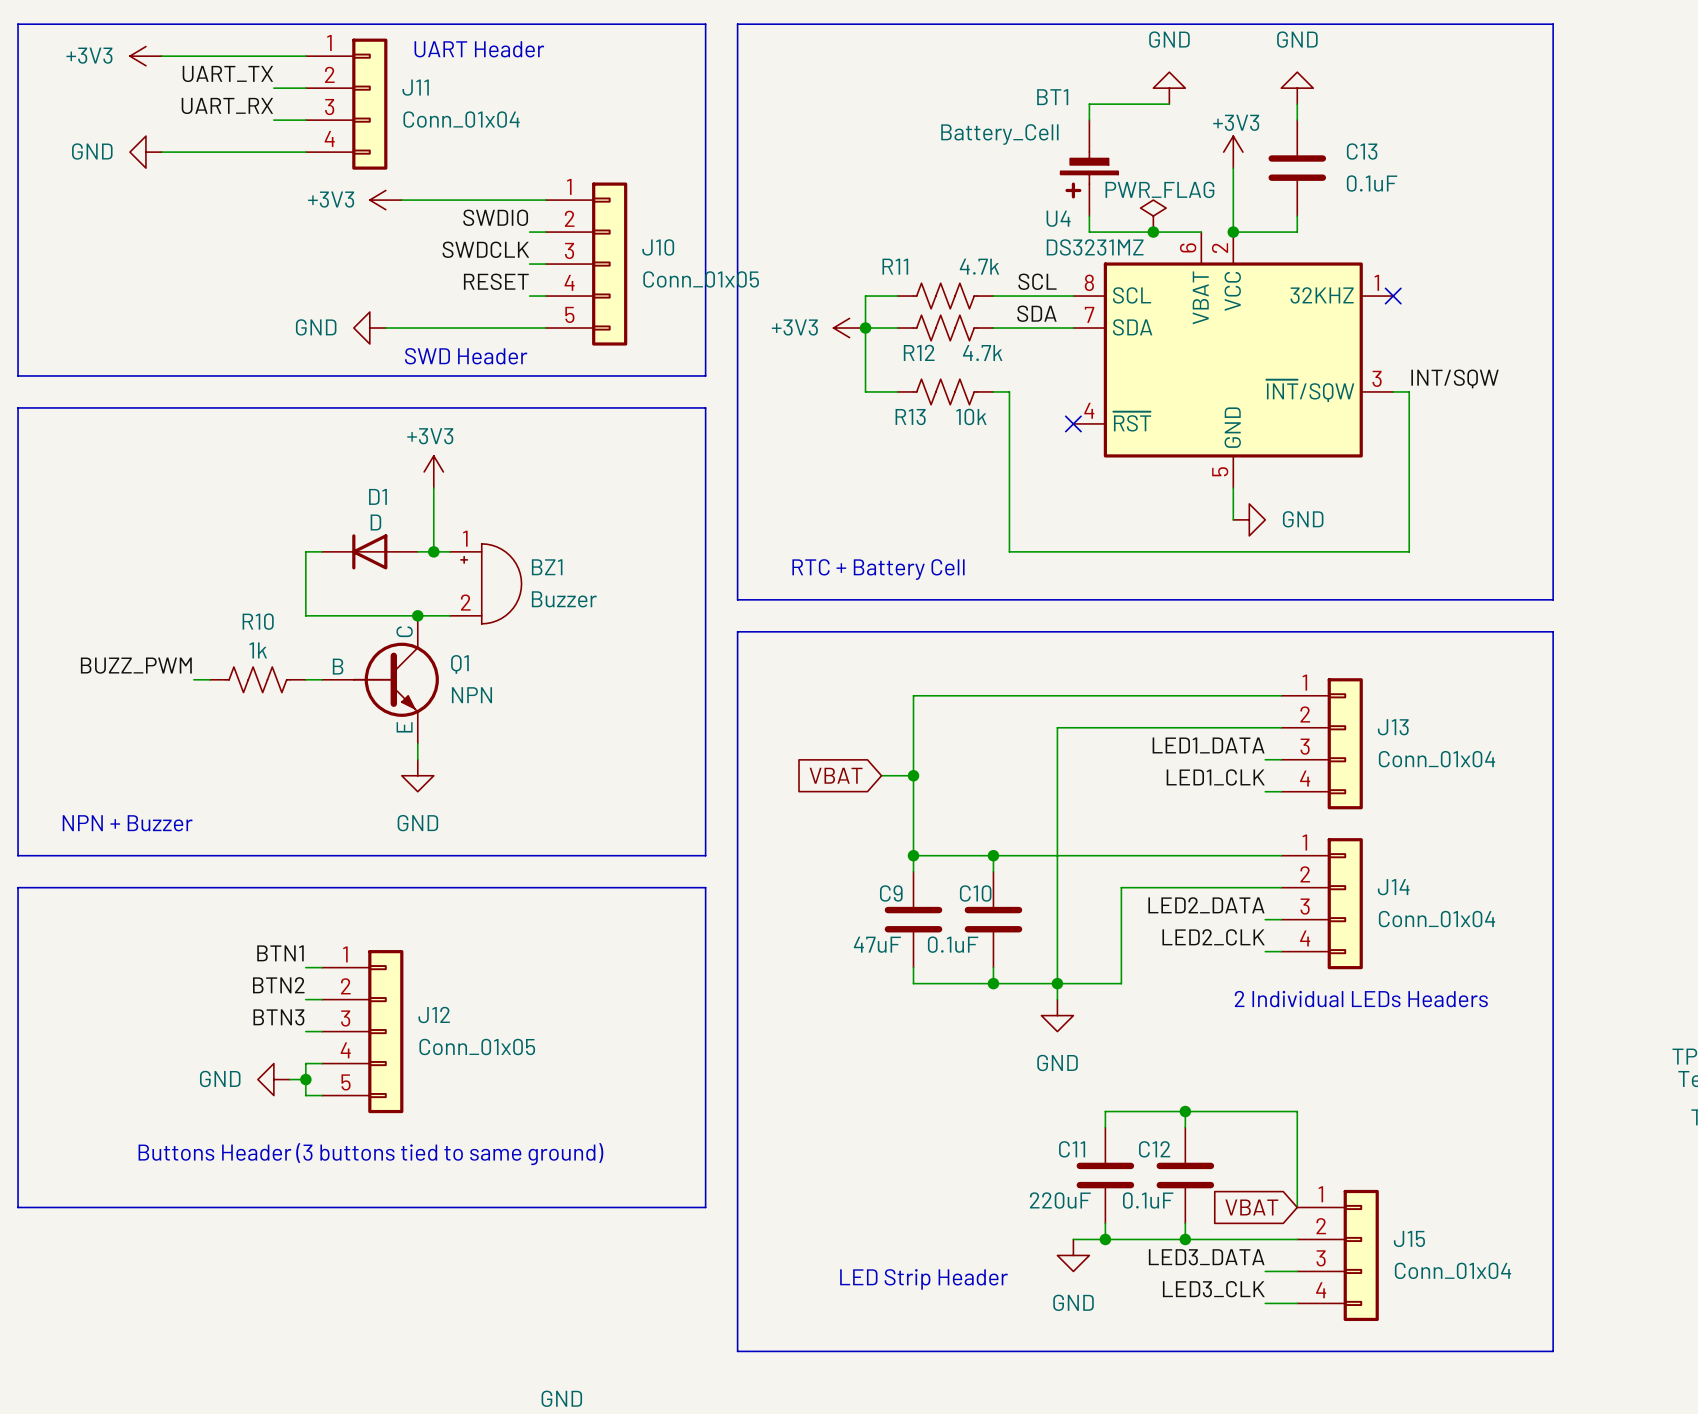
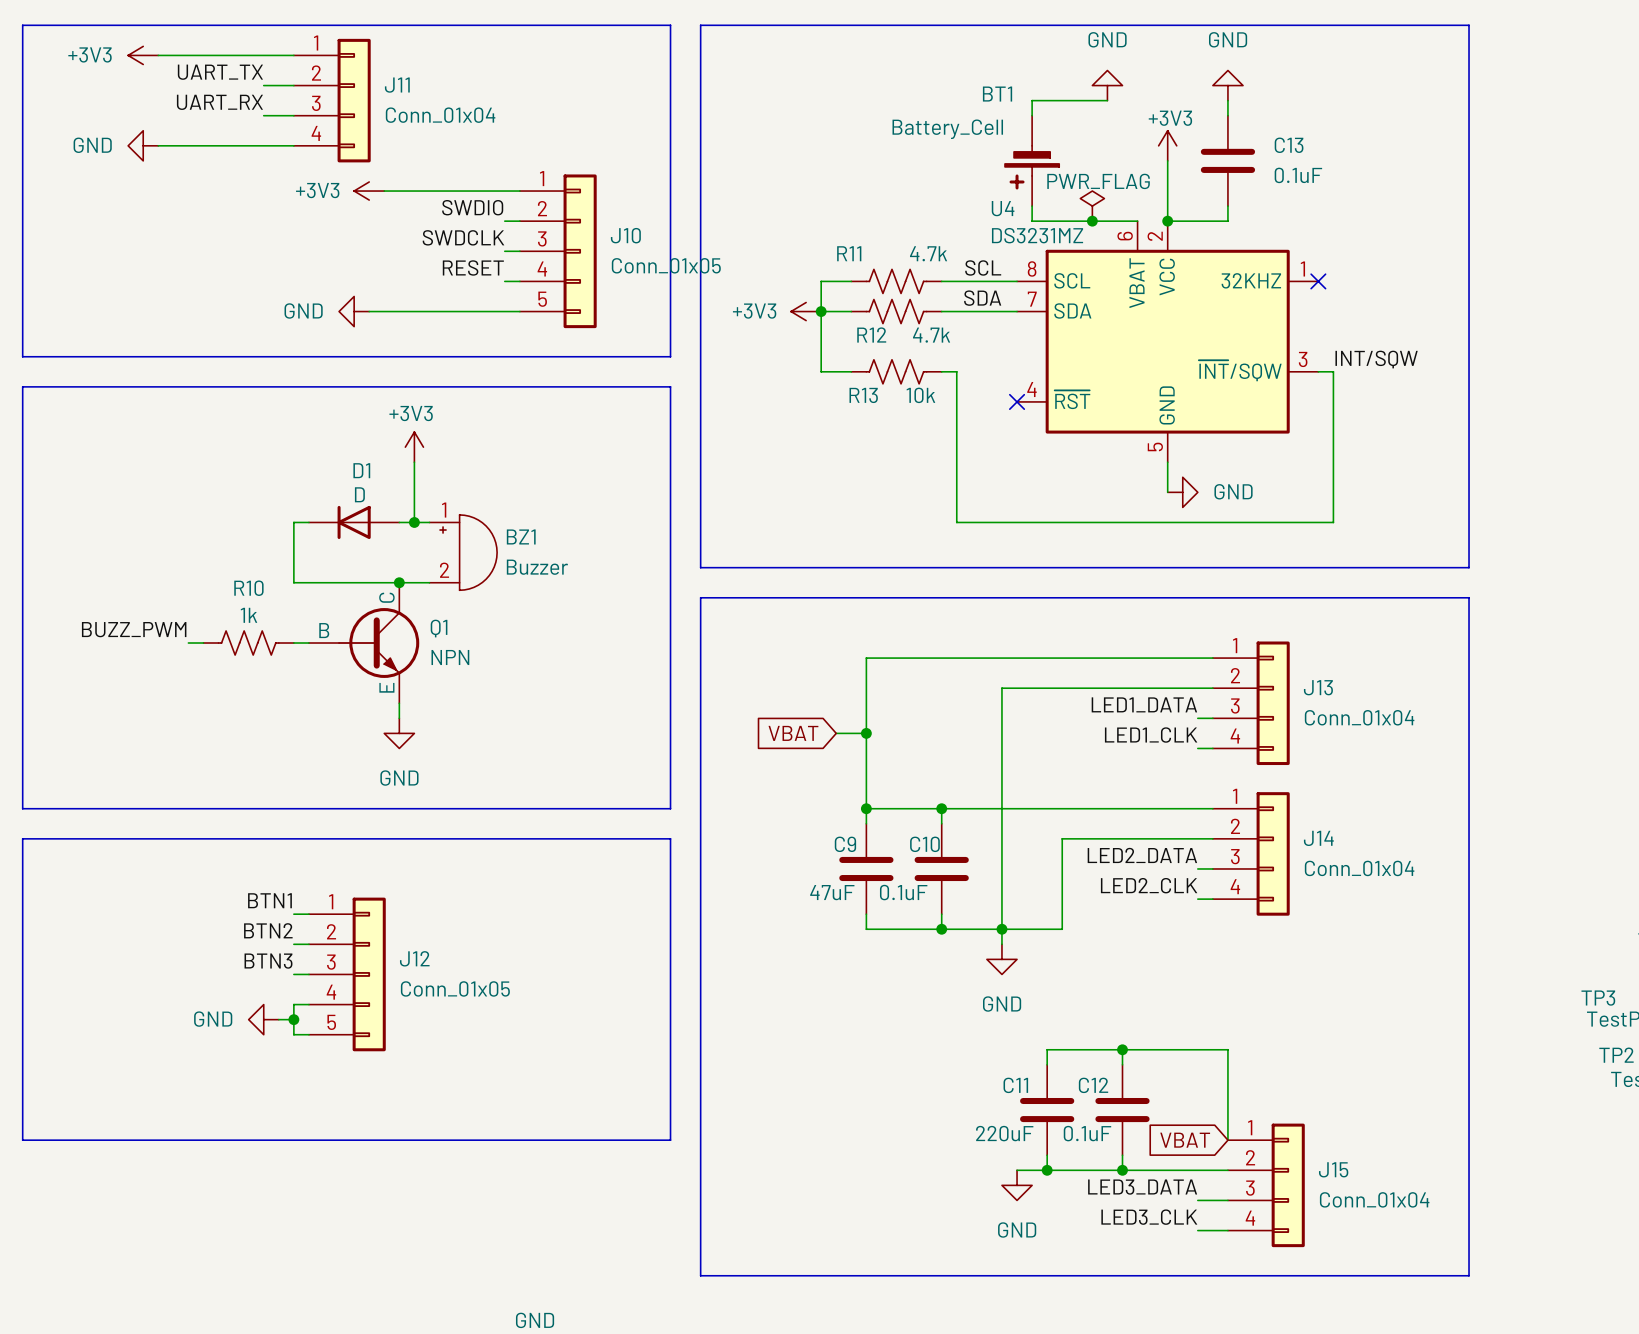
text: UART Header (479, 49) -> none
text: SWD Header (466, 356) -> none
text: RTC + Battery Cell (878, 569) -> none
text: NPN + Buzzer (127, 823) -> none
text: 2 Individual LEDs Headers (1361, 999) -> none
text: Buttons Header (3 buttons tied to same ground) (370, 1154) -> none
text: LED Strip Header (923, 1279) -> none

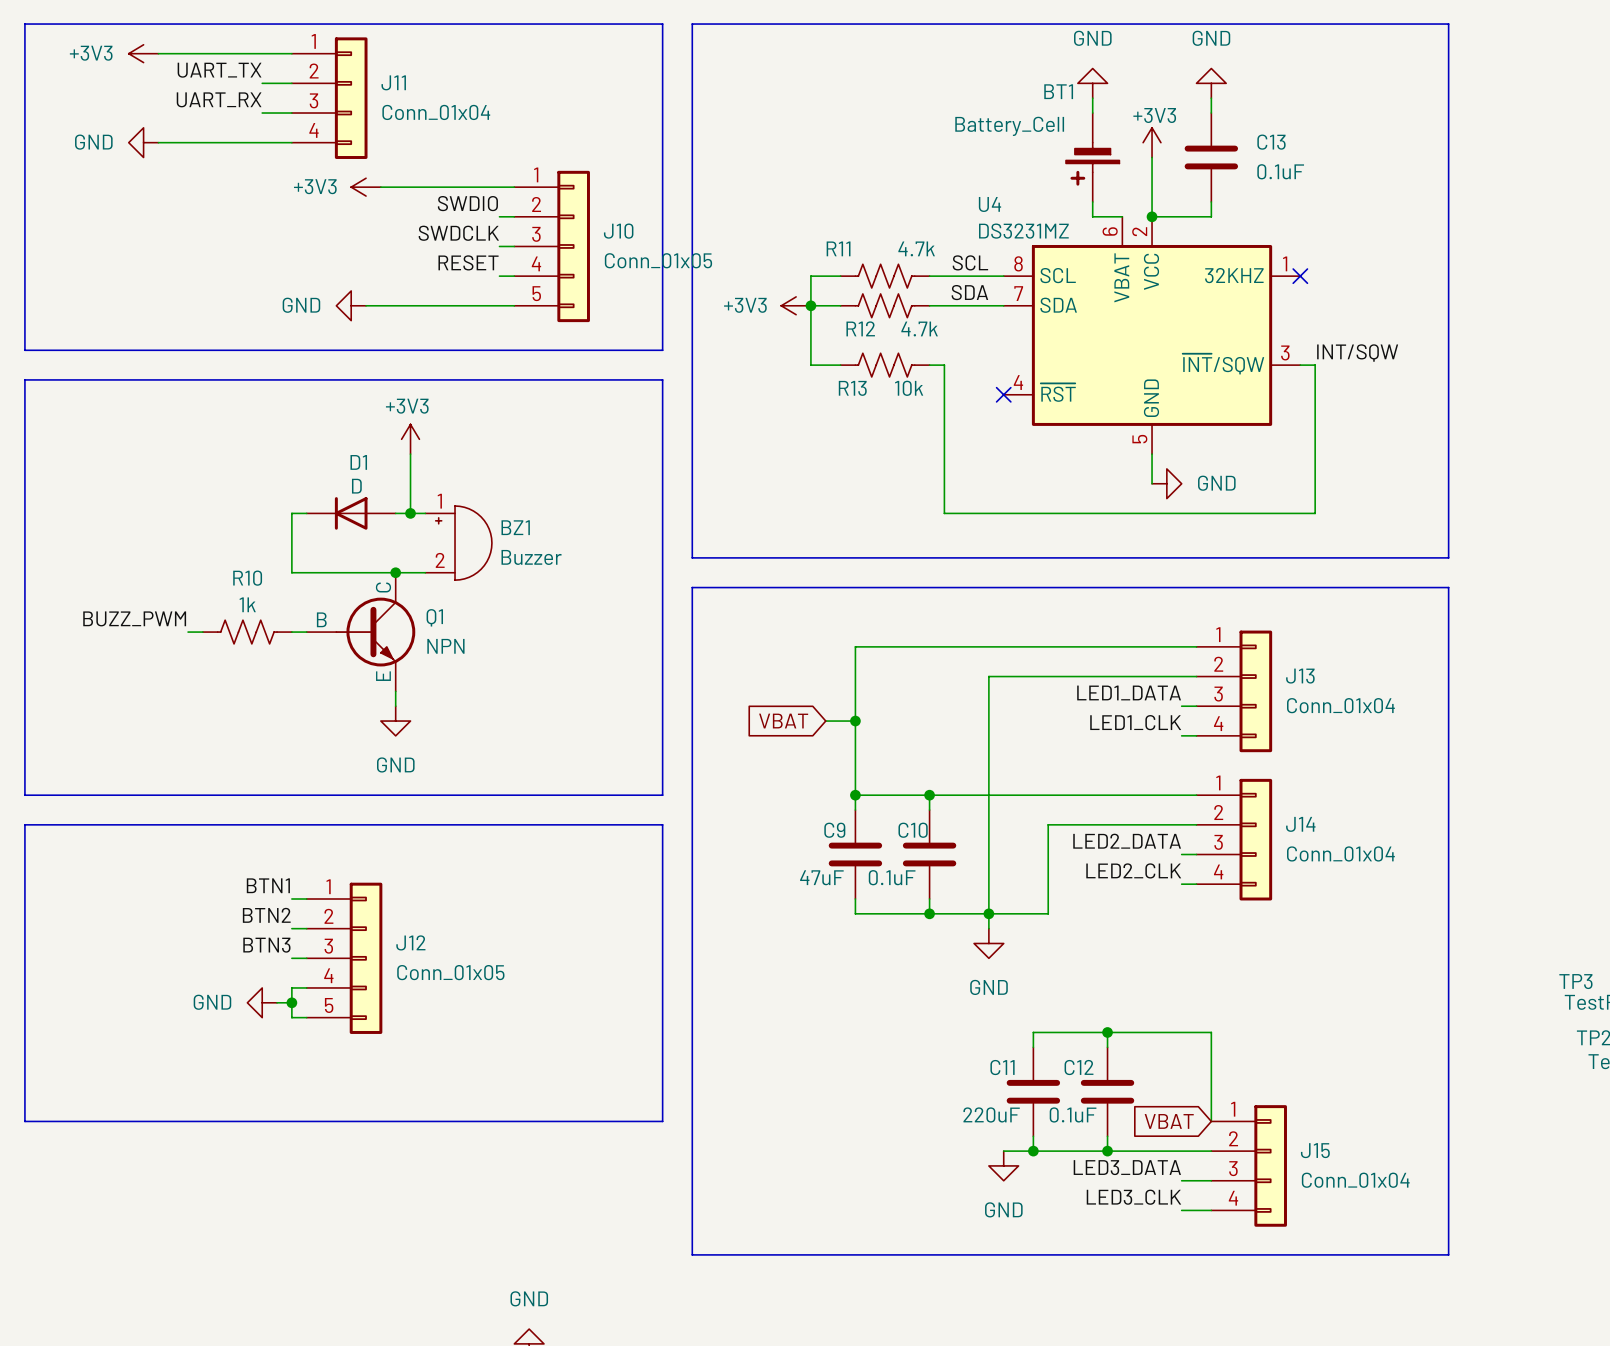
wire: (1107, 100) (1032, 100) (1032, 115) -> (1092, 98) (1092, 113)
BT1 position: (1032, 160) -> (1092, 157)
wire: (1032, 206) (1032, 221) (1107, 221) -> (1092, 201) (1092, 216)
power symbol: PWR_FLAG (1092, 206) -> none
junction: (1092, 221) -> none

